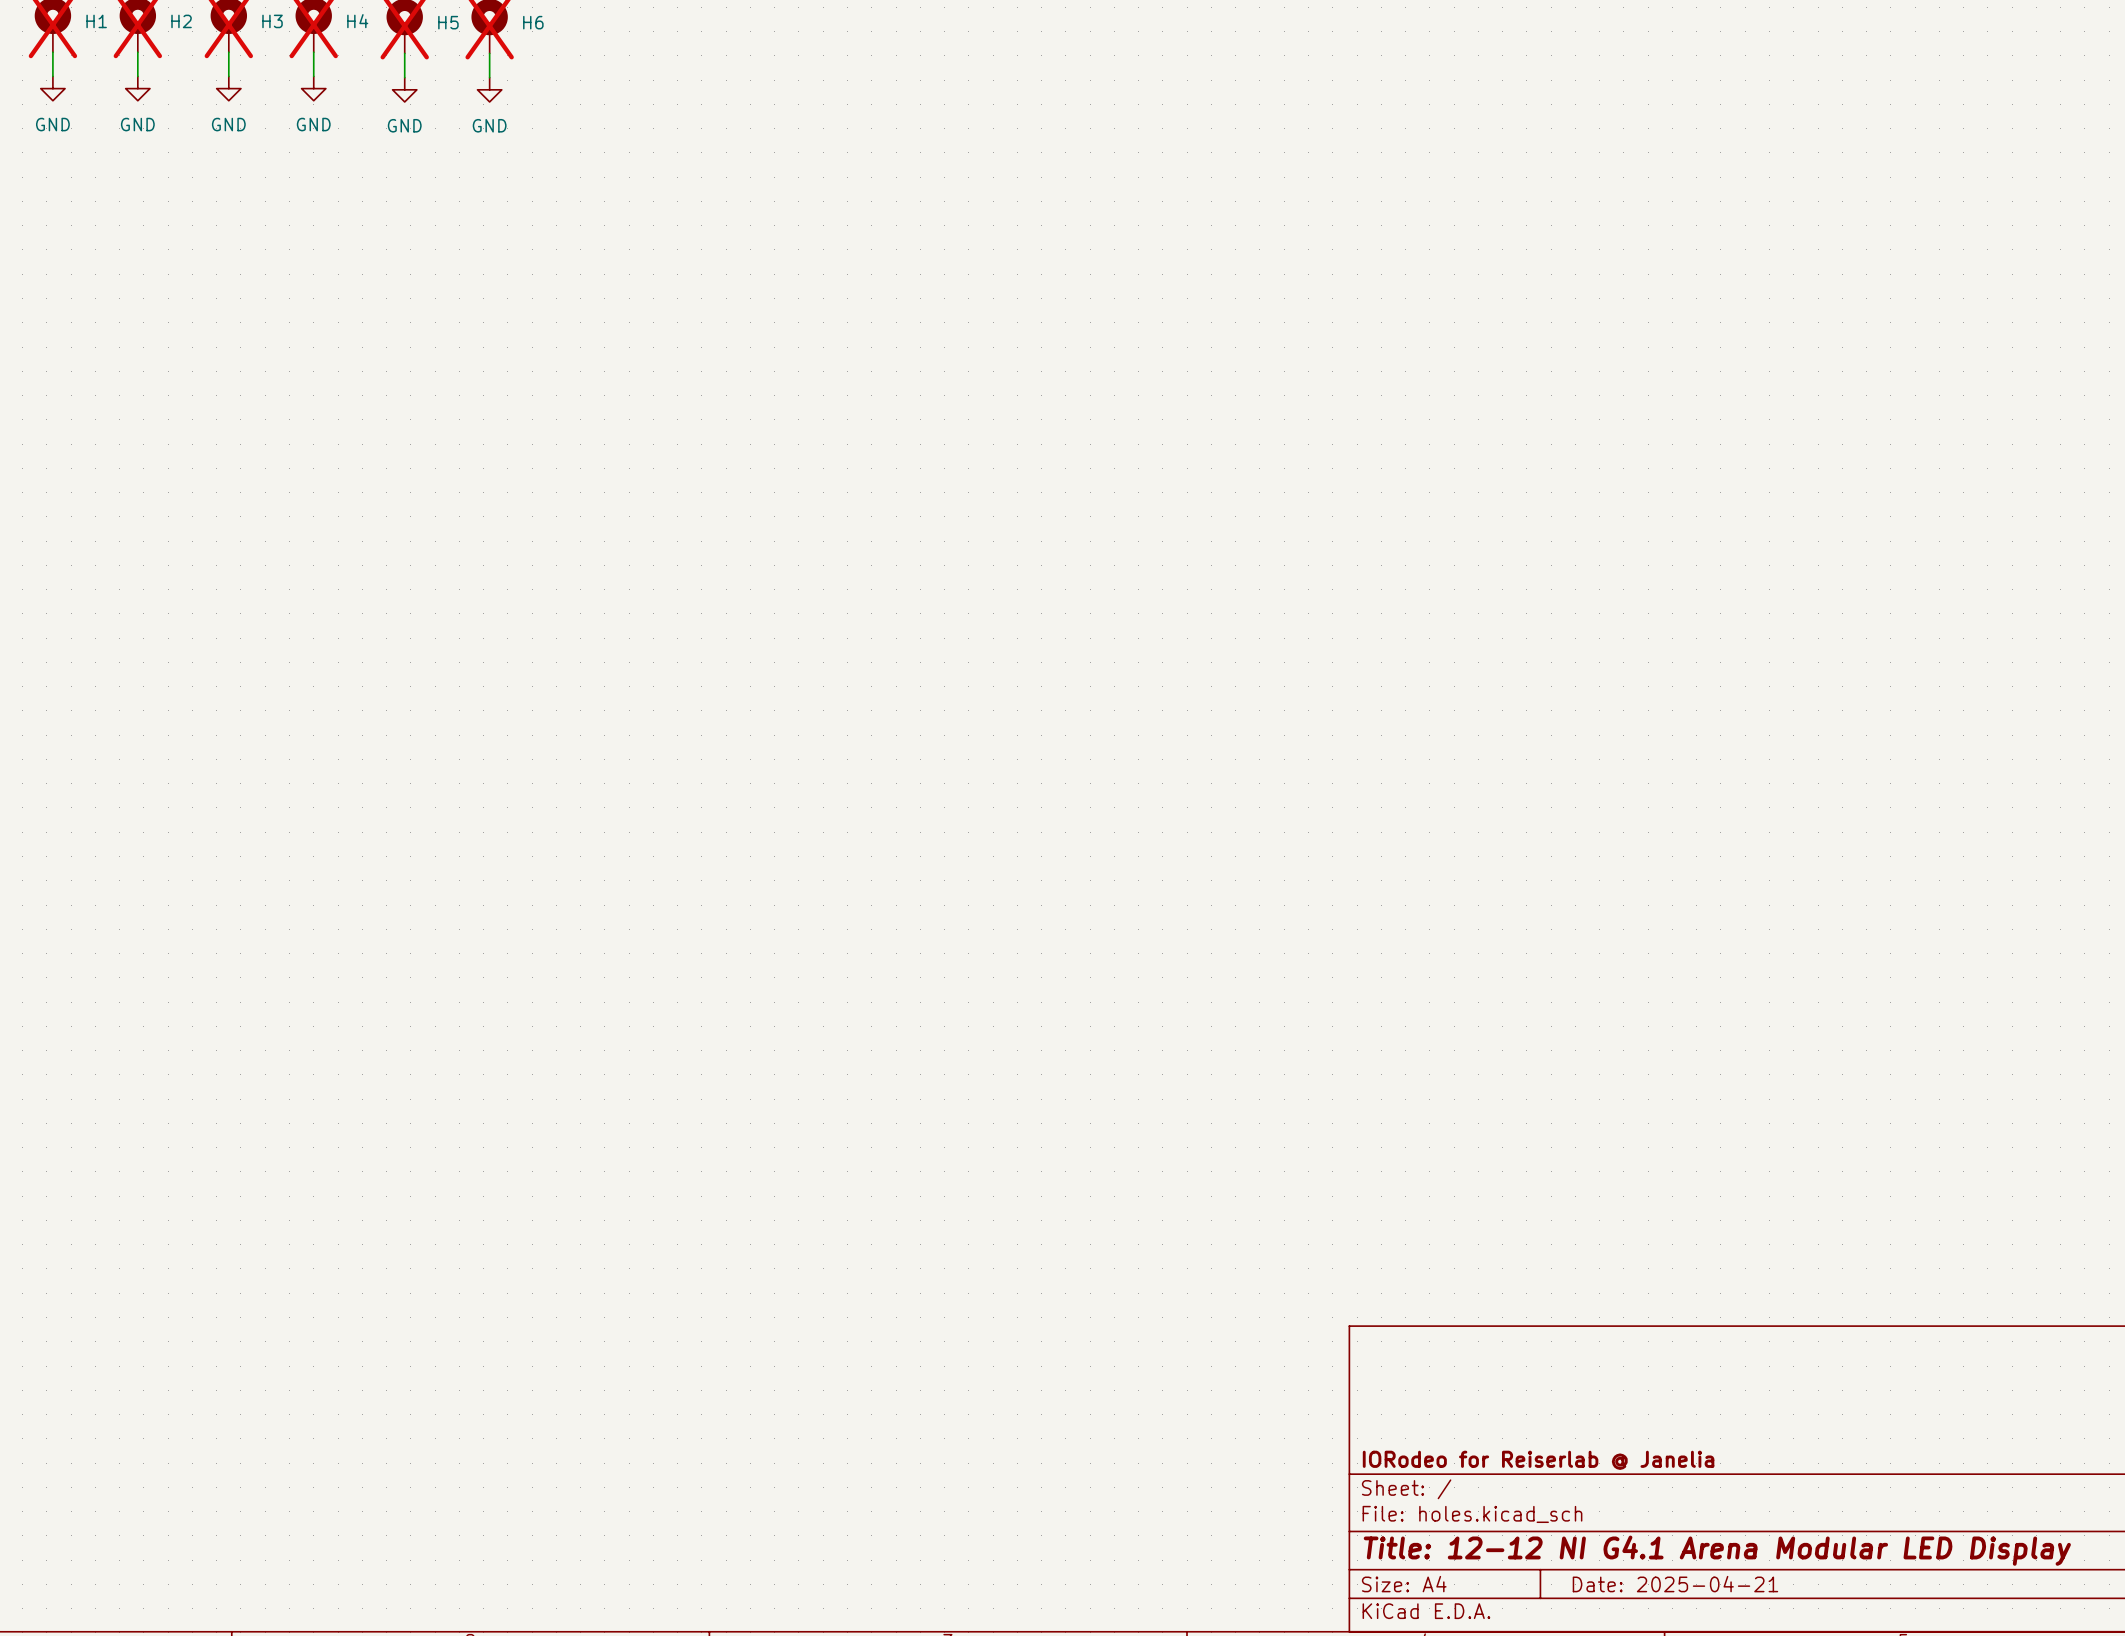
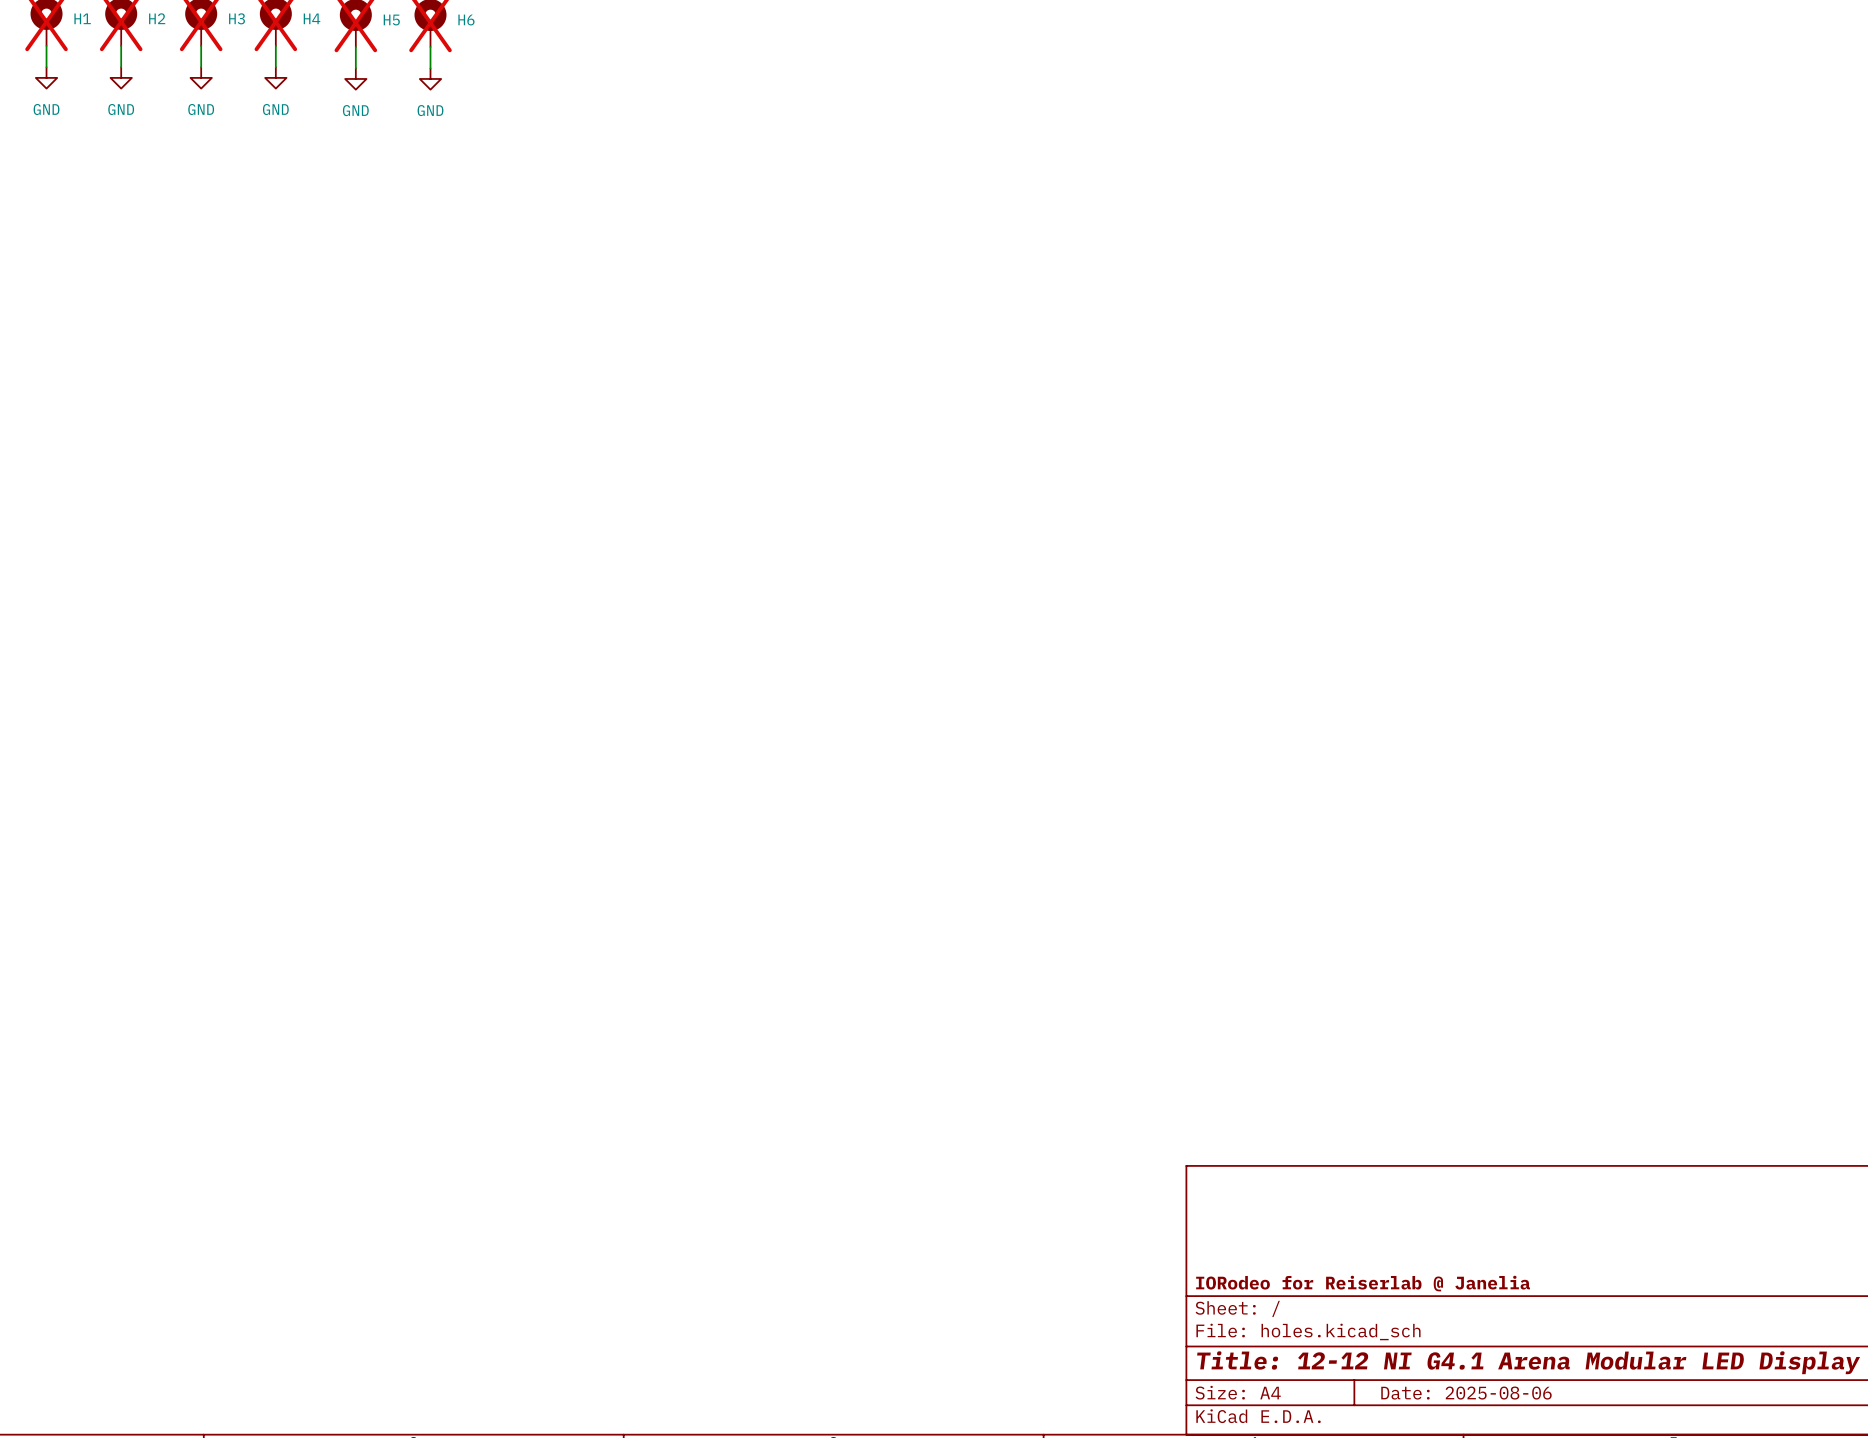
title block: Date: 2025-04-21 (1675, 1584) -> Date: 2025-08-06 (1466, 1393)

